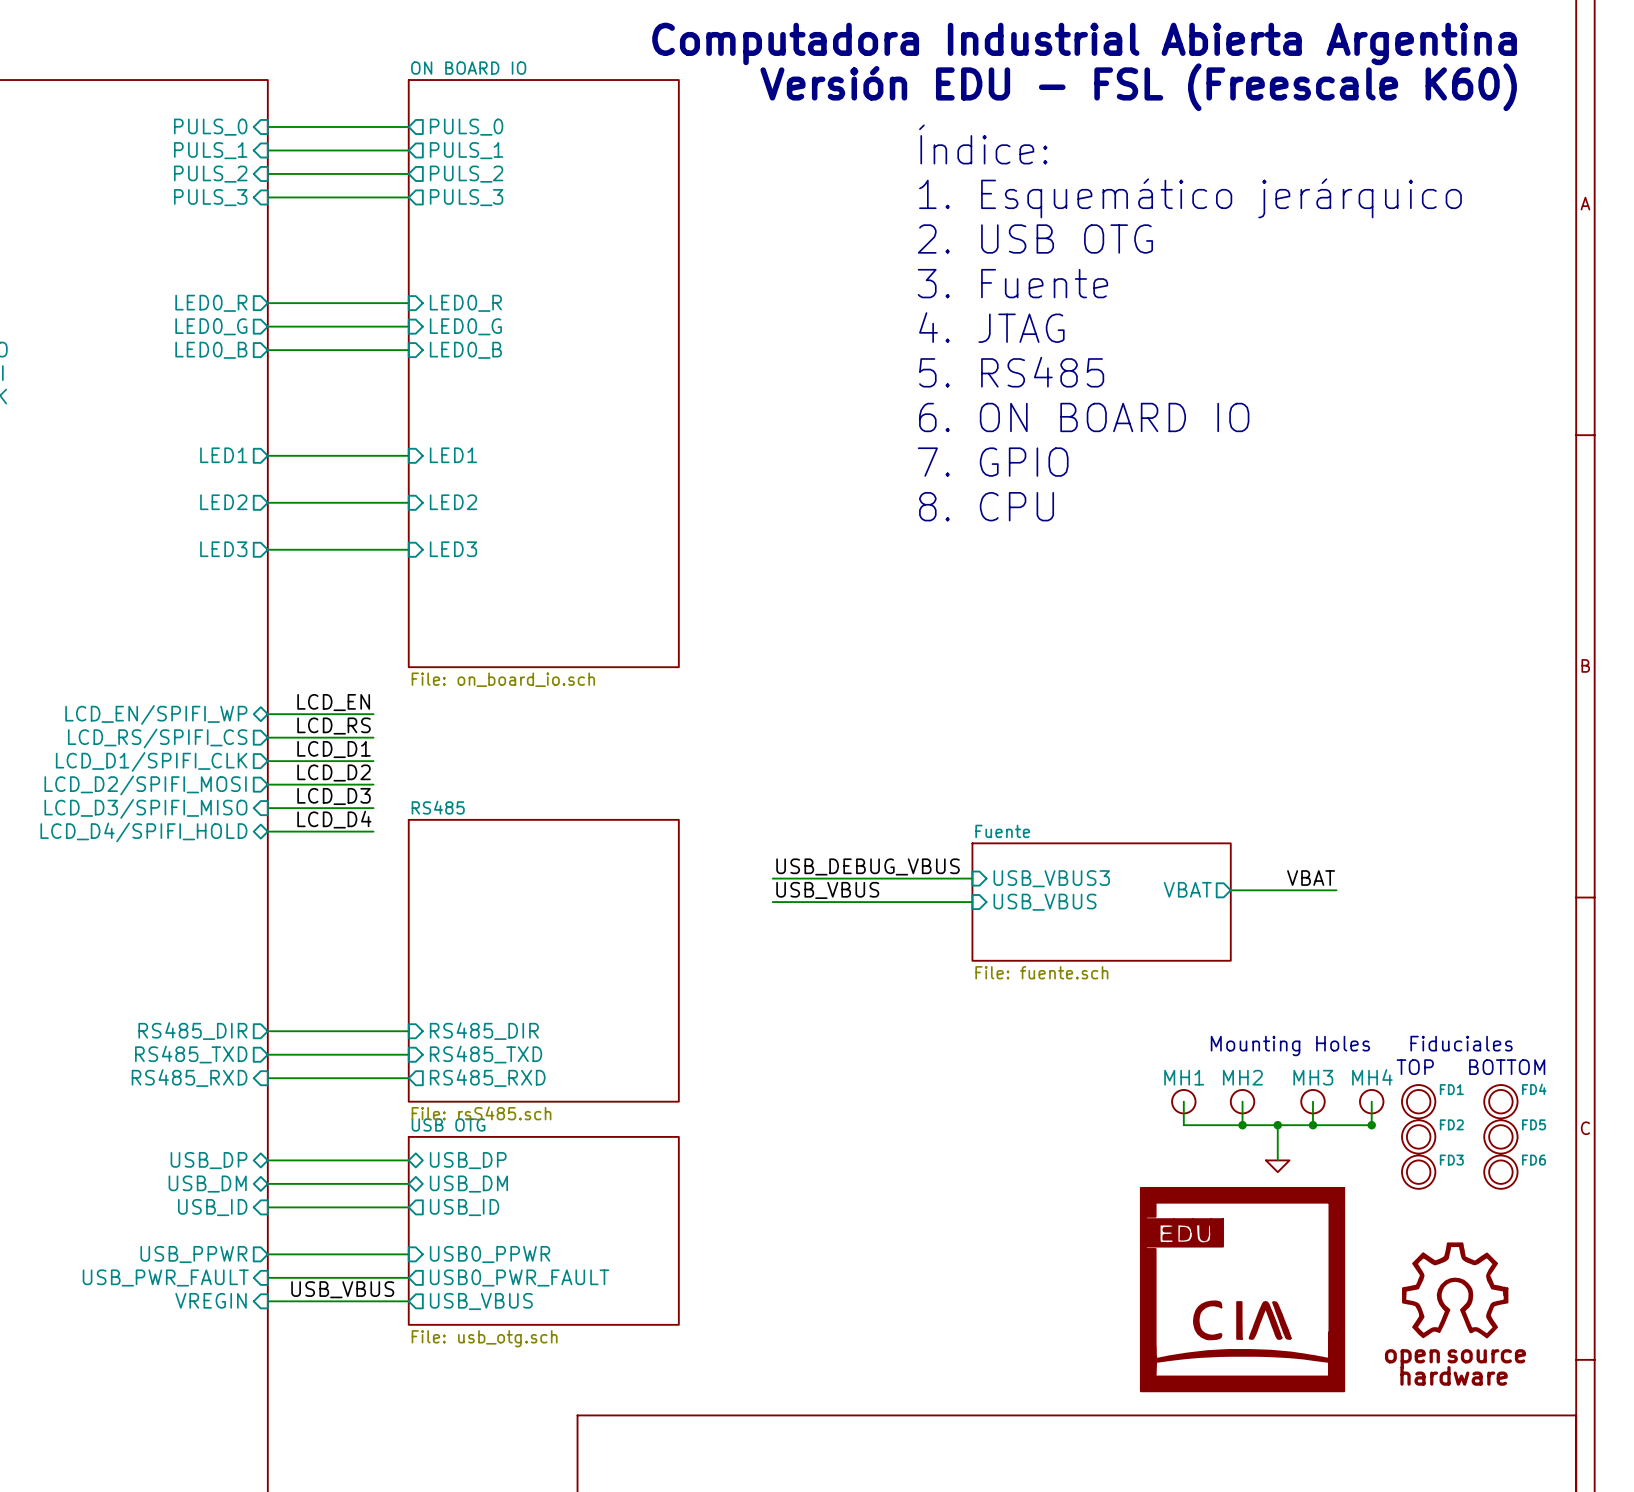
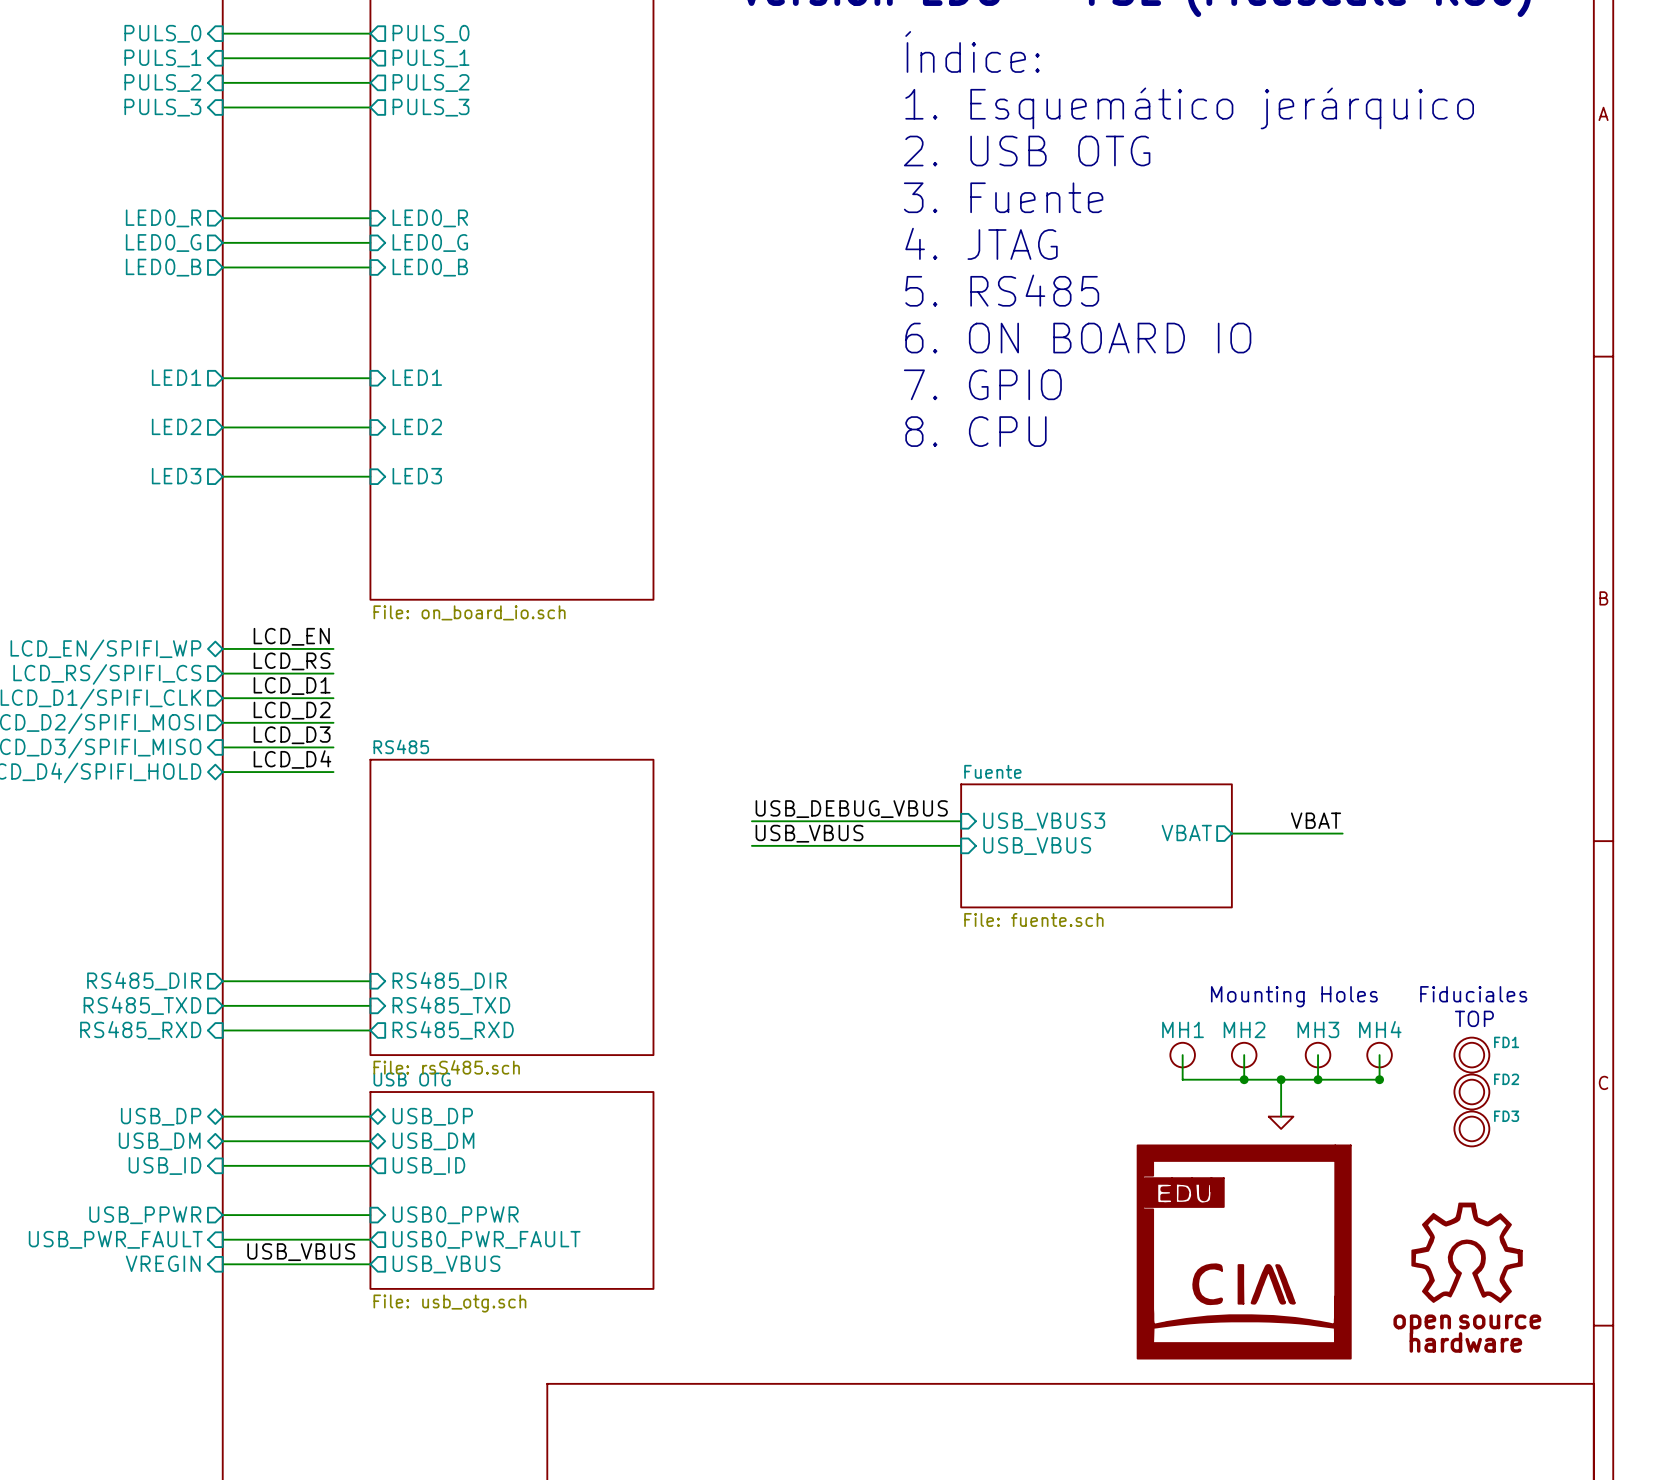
text position: TOP (1415, 1067) -> TOP (1474, 1018)
text: BOTTOM (1507, 1067) -> none
FD1 position: (1418, 1101) -> (1471, 1055)
FD4: (1500, 1101) -> none
FD2 position: (1418, 1136) -> (1471, 1092)
FD5: (1500, 1136) -> none
FD3 position: (1418, 1172) -> (1471, 1128)
FD6: (1500, 1172) -> none

